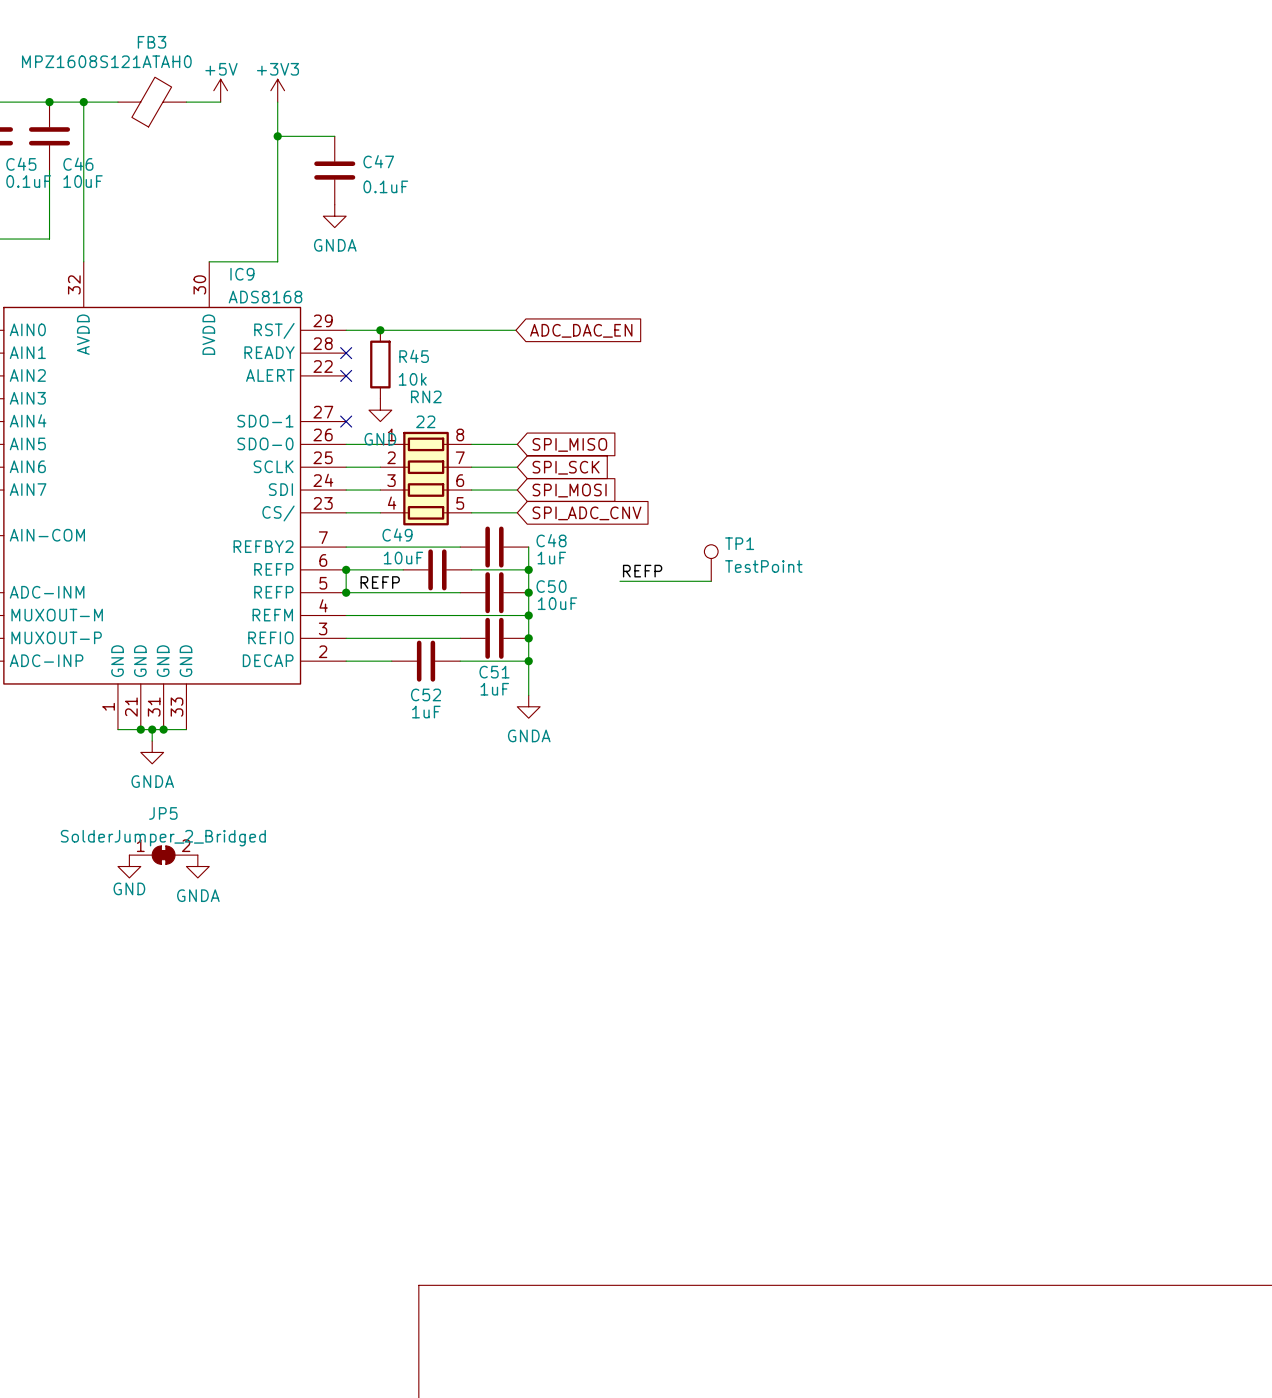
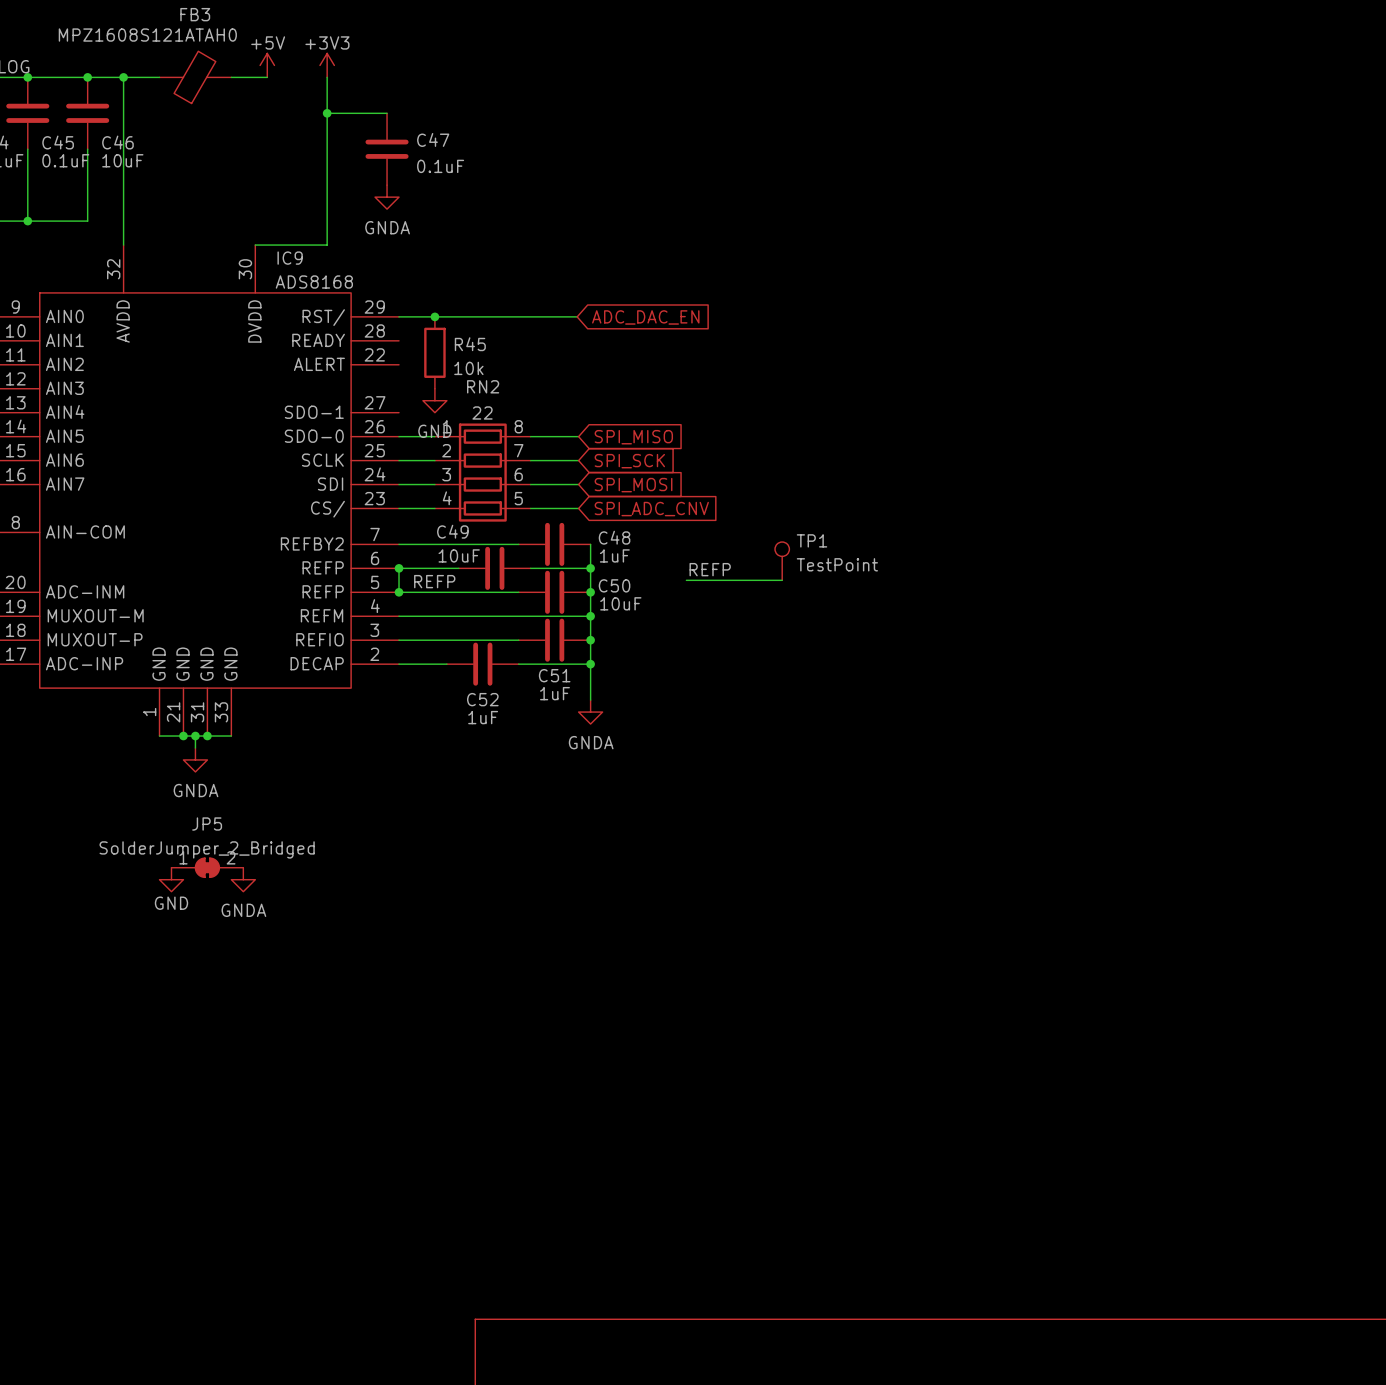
no-connect mark: (346, 353) -> none
no-connect mark: (346, 375) -> none
no-connect mark: (346, 421) -> none

